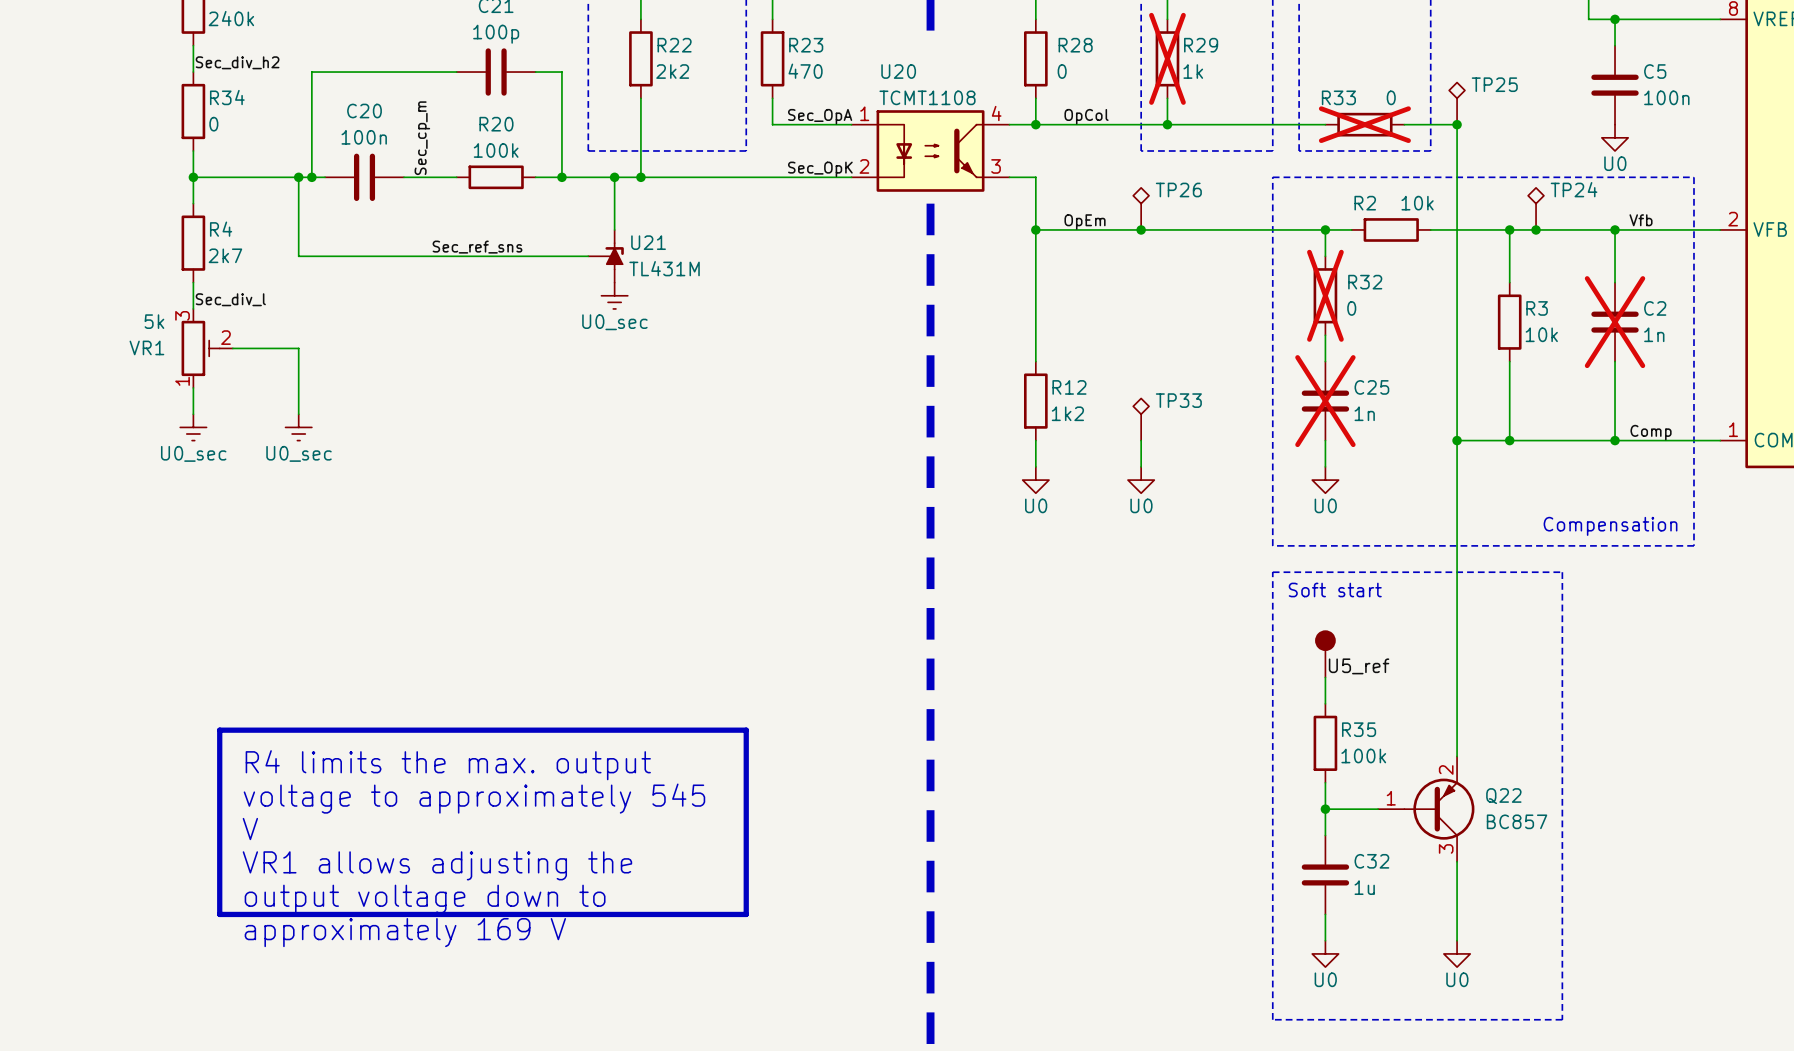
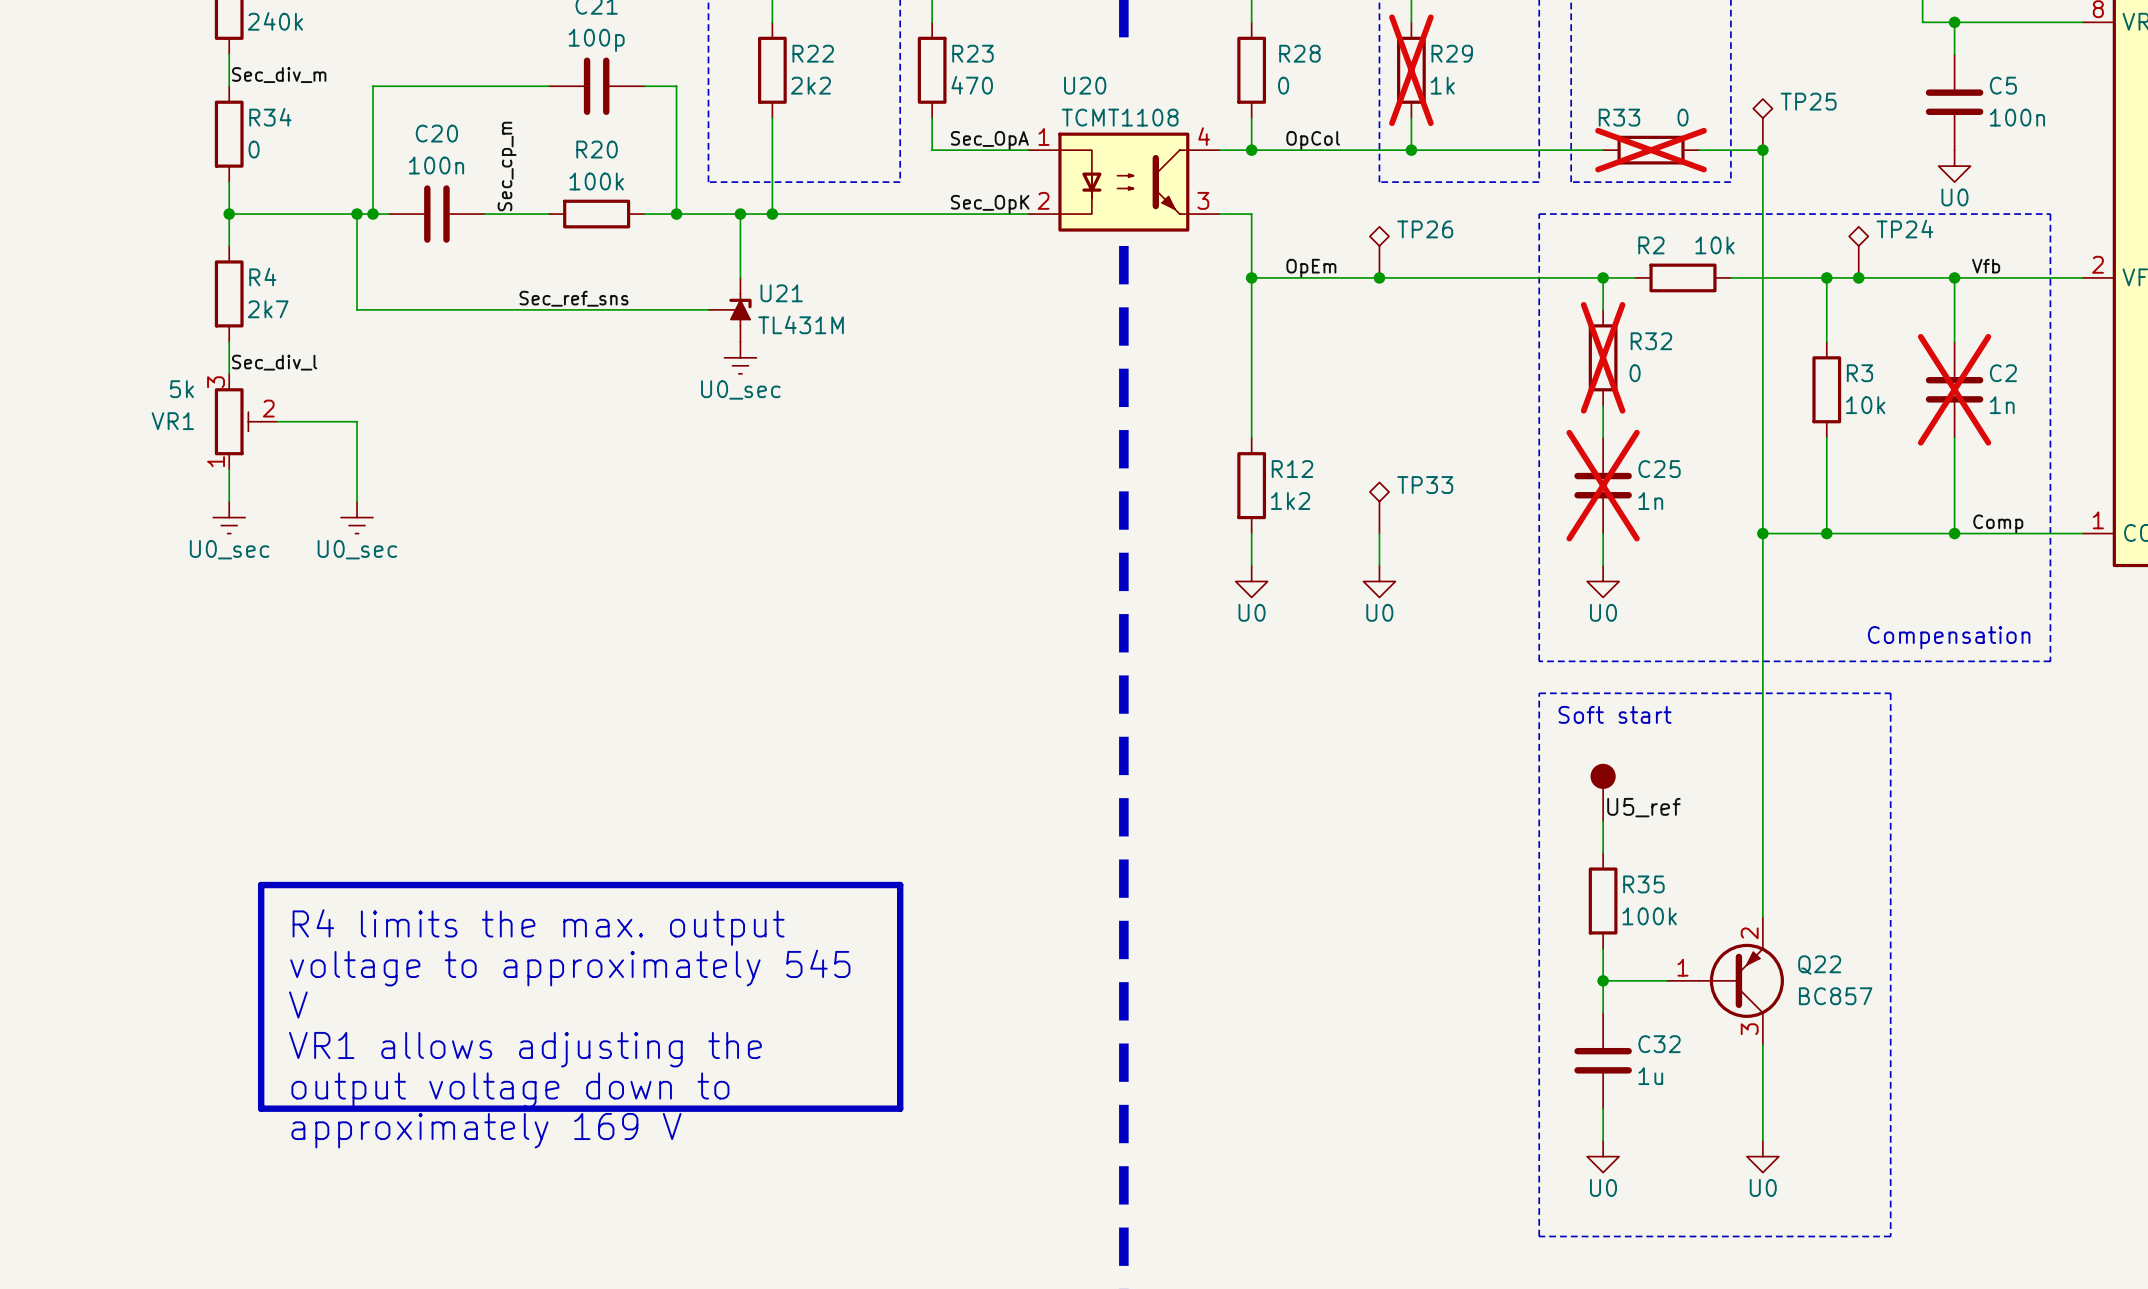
label: Sec_div_h2 (237, 62) -> Sec_div_m (279, 75)

